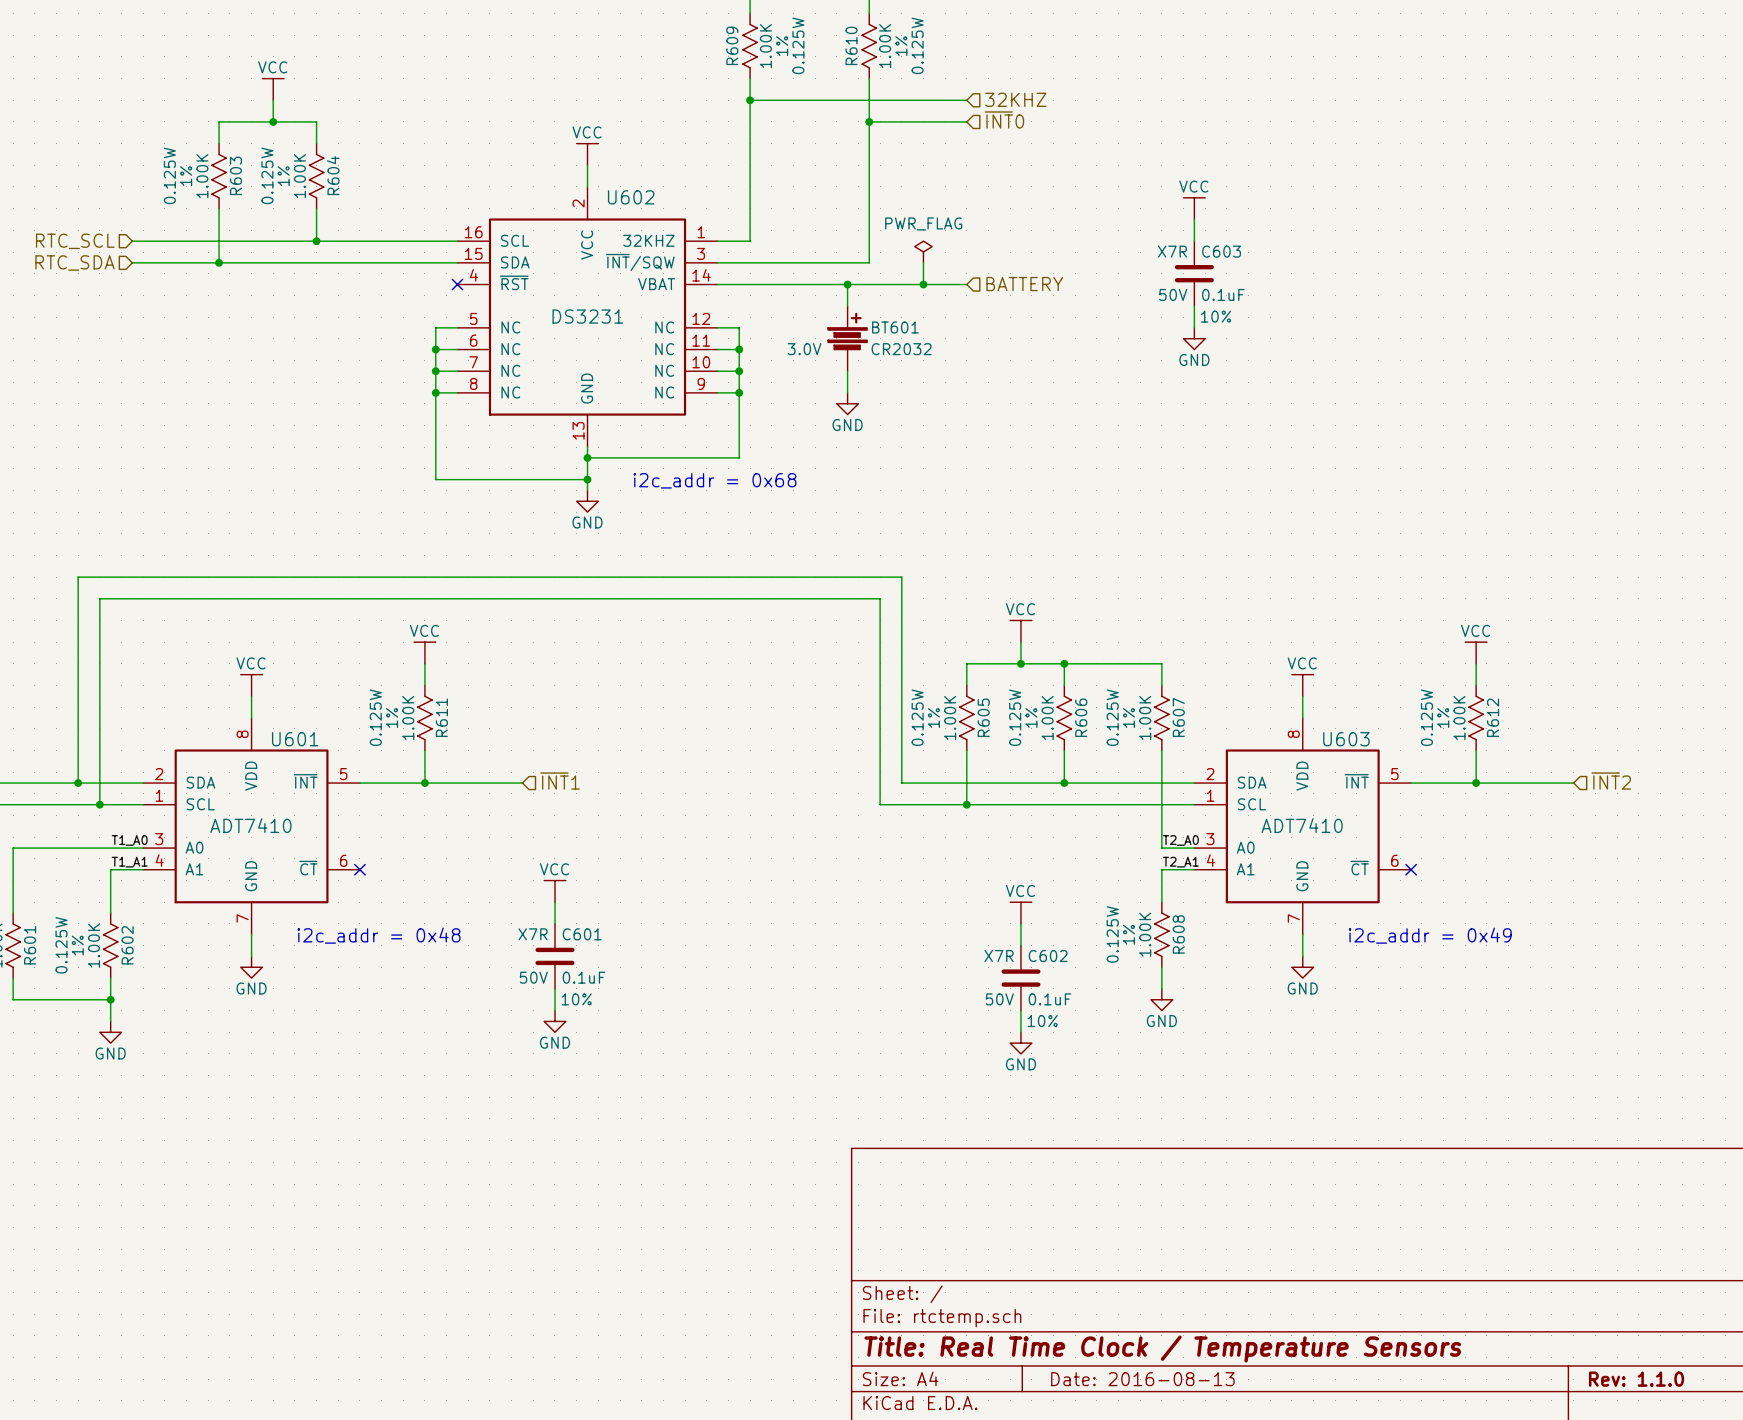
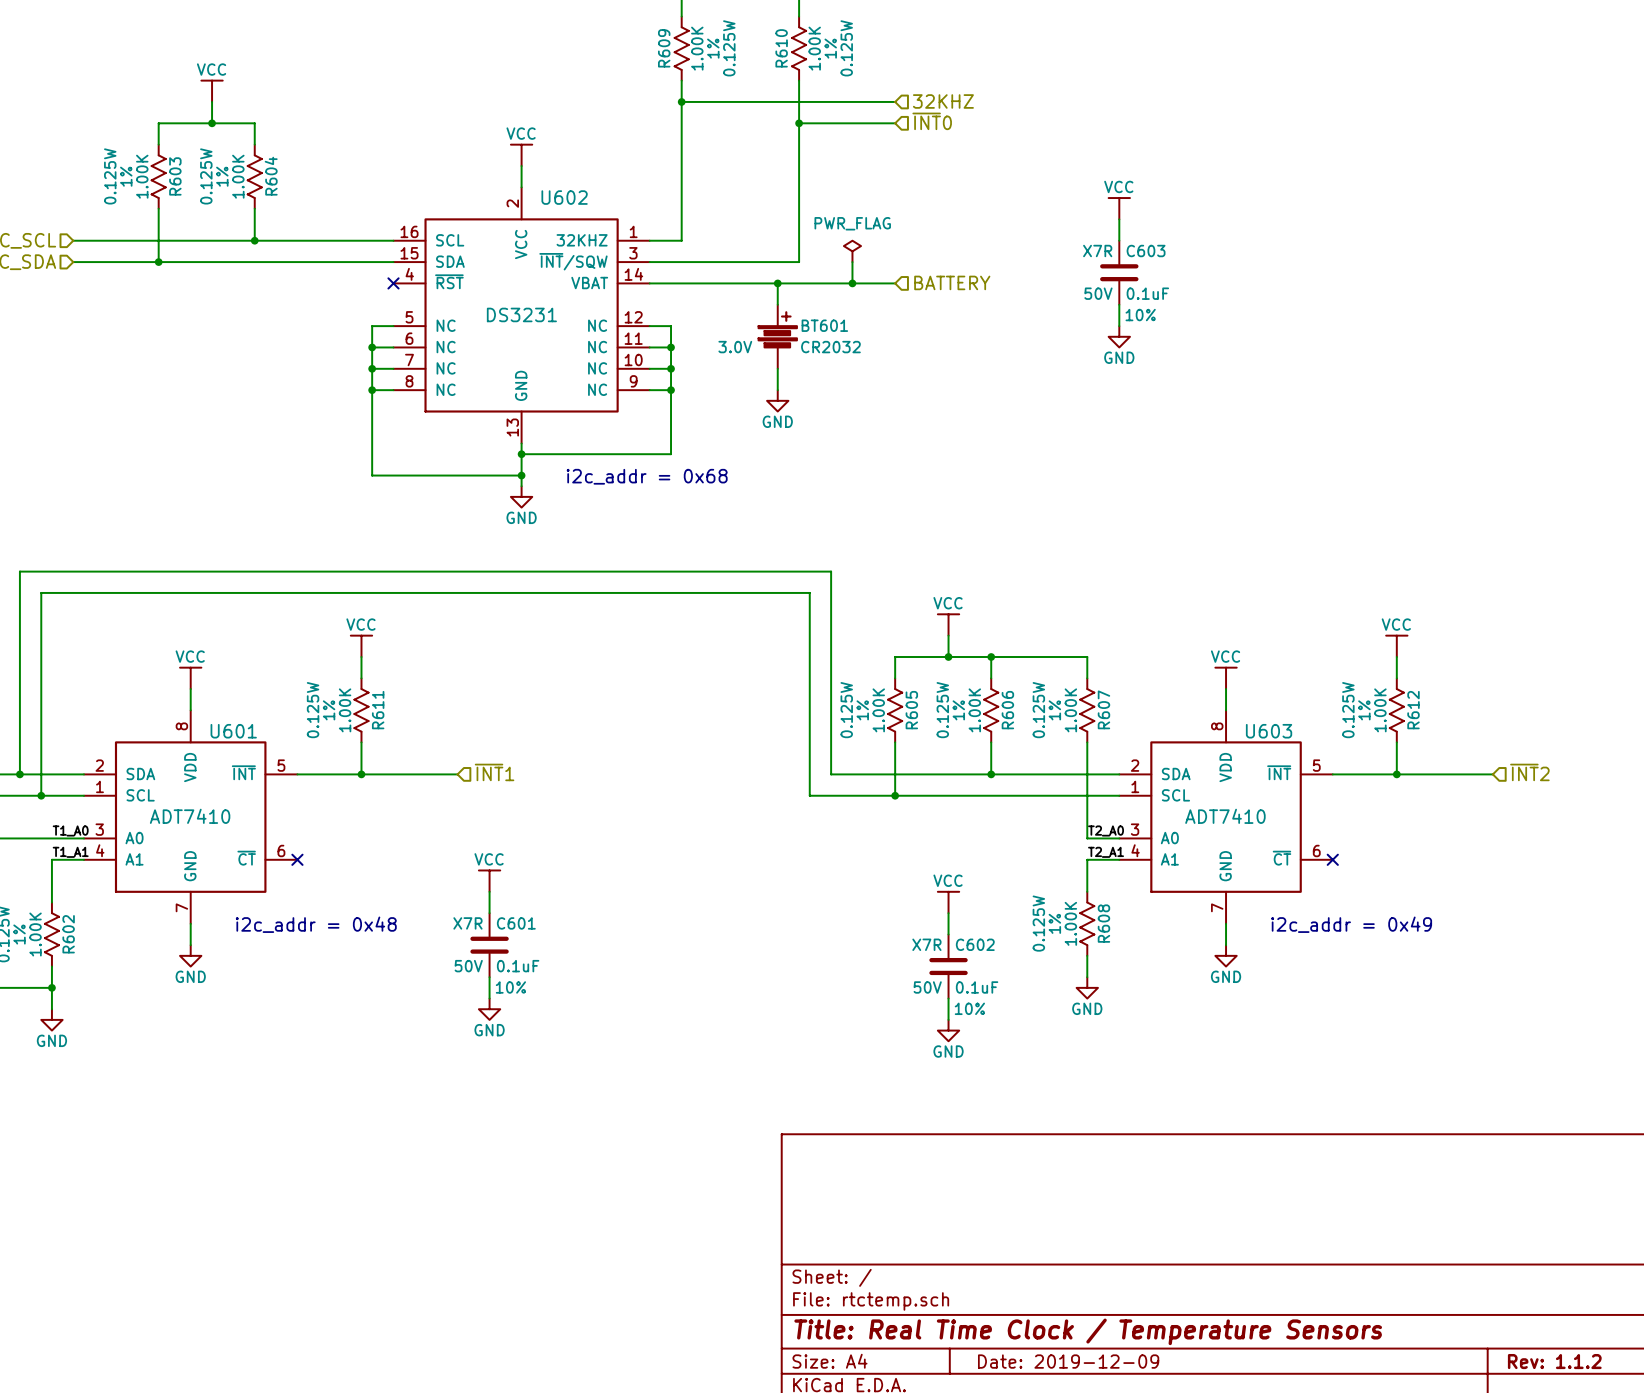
title block: Date: 2016-08-13 (1142, 1379) -> Date: 2019-12-09 (1068, 1361)
title block: Rev: 1.1.0 (1636, 1379) -> Rev: 1.1.2 (1554, 1361)

